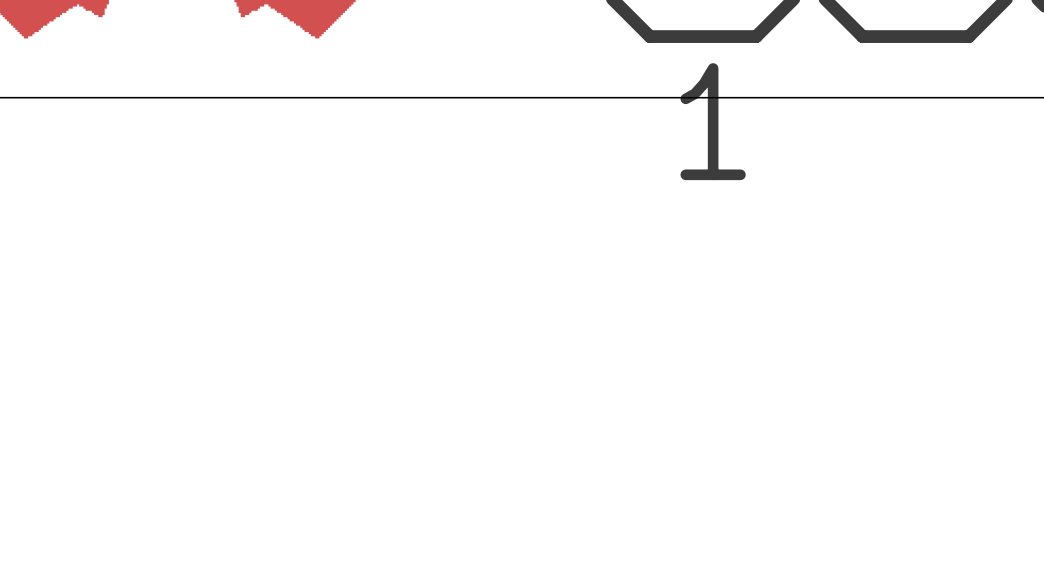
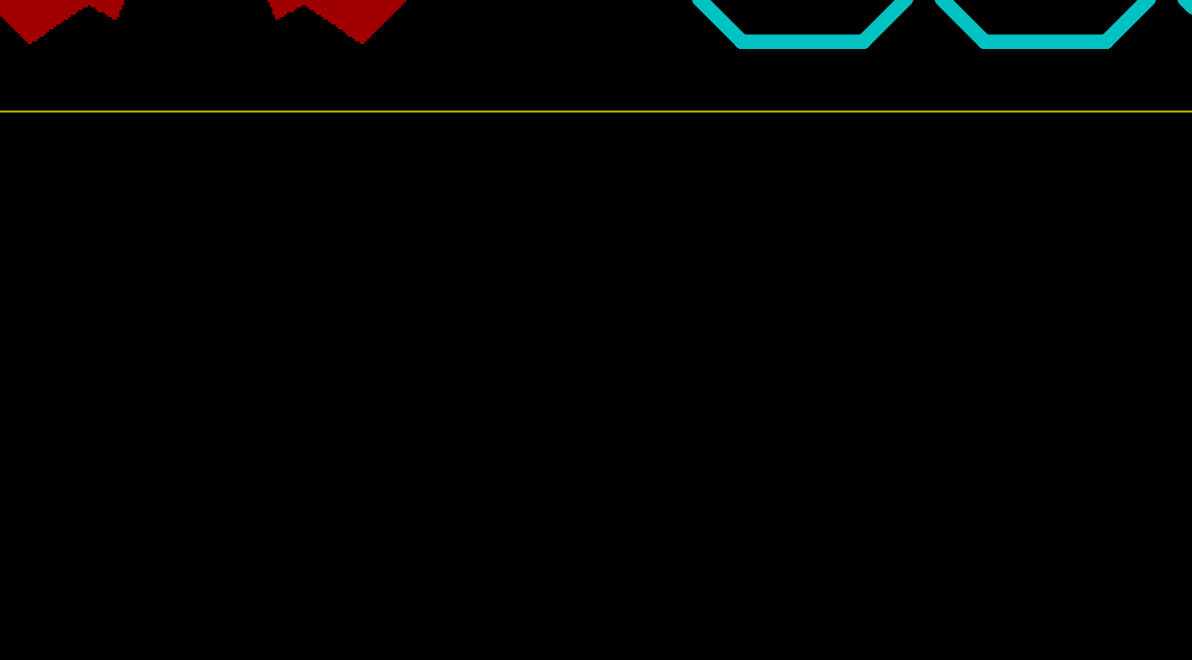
part text: 1 (713, 121) -> none

